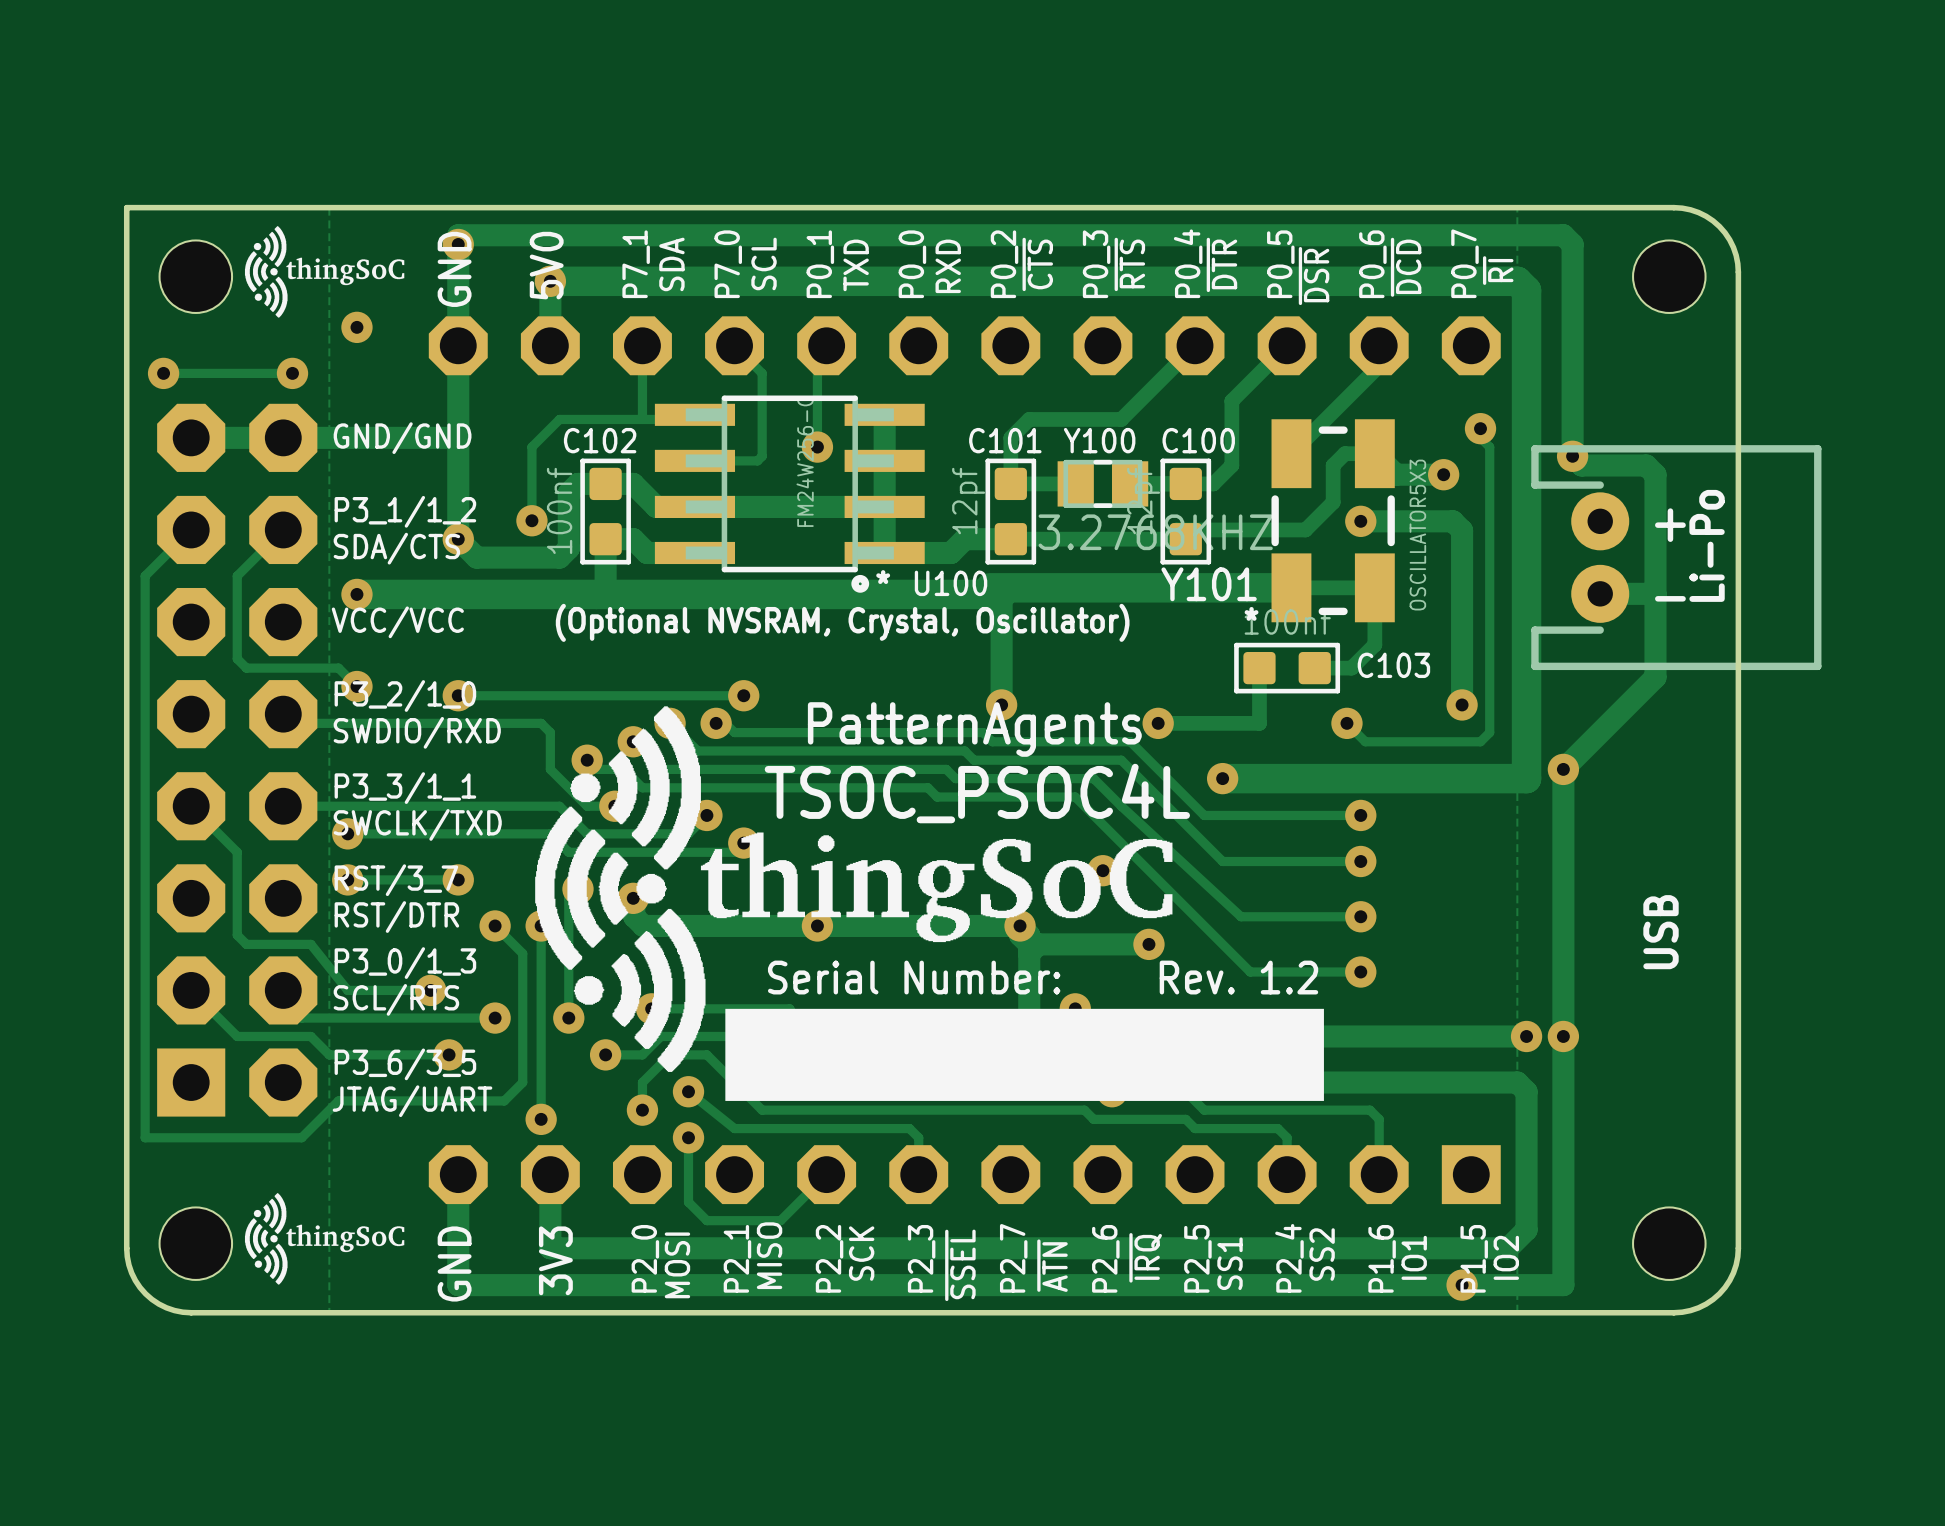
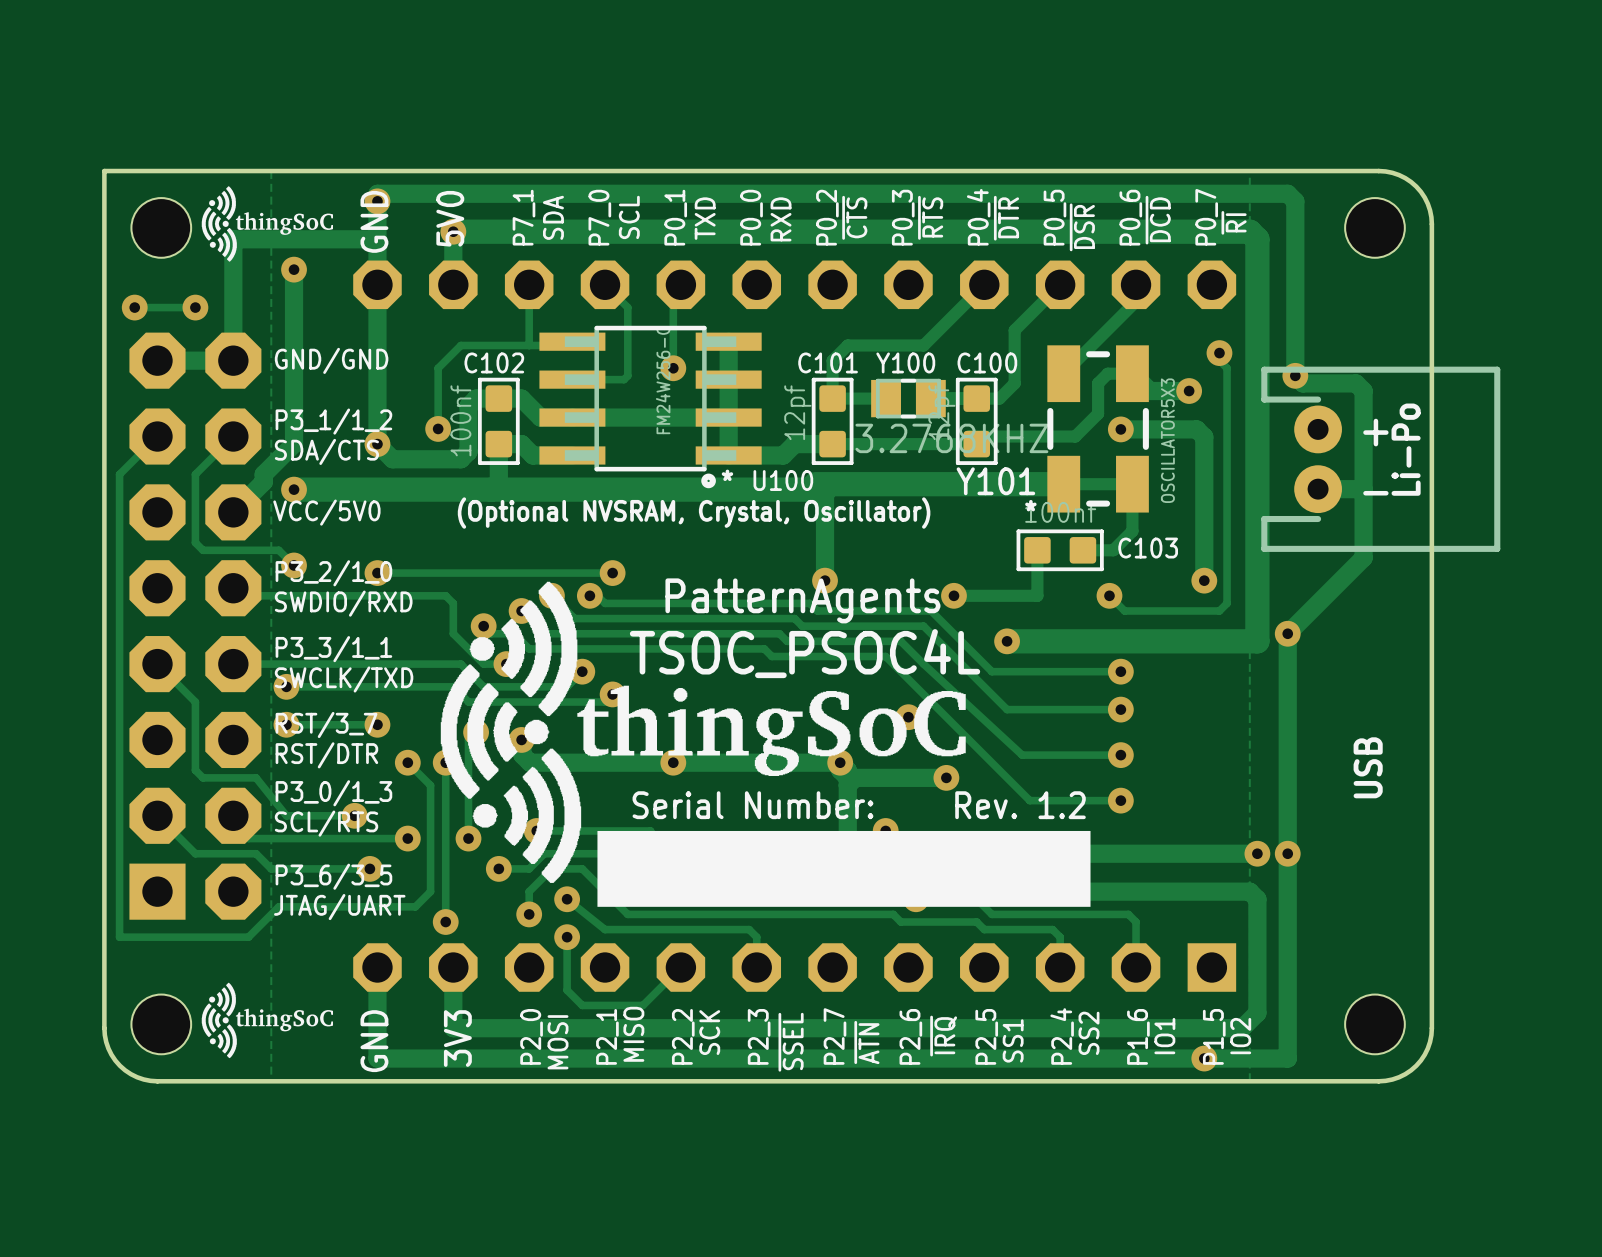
track: none -> (294, 269) (294, 444) (263, 474) (263, 482) (233, 512)
track: (292, 373) (237, 373) -> none
via position: (292, 373) -> (195, 307)
track: (458, 437) (283, 437) -> (377, 239) (233, 239) (233, 360)
text: VCC/VCC (397, 622) -> VCC/5V0 (326, 512)

